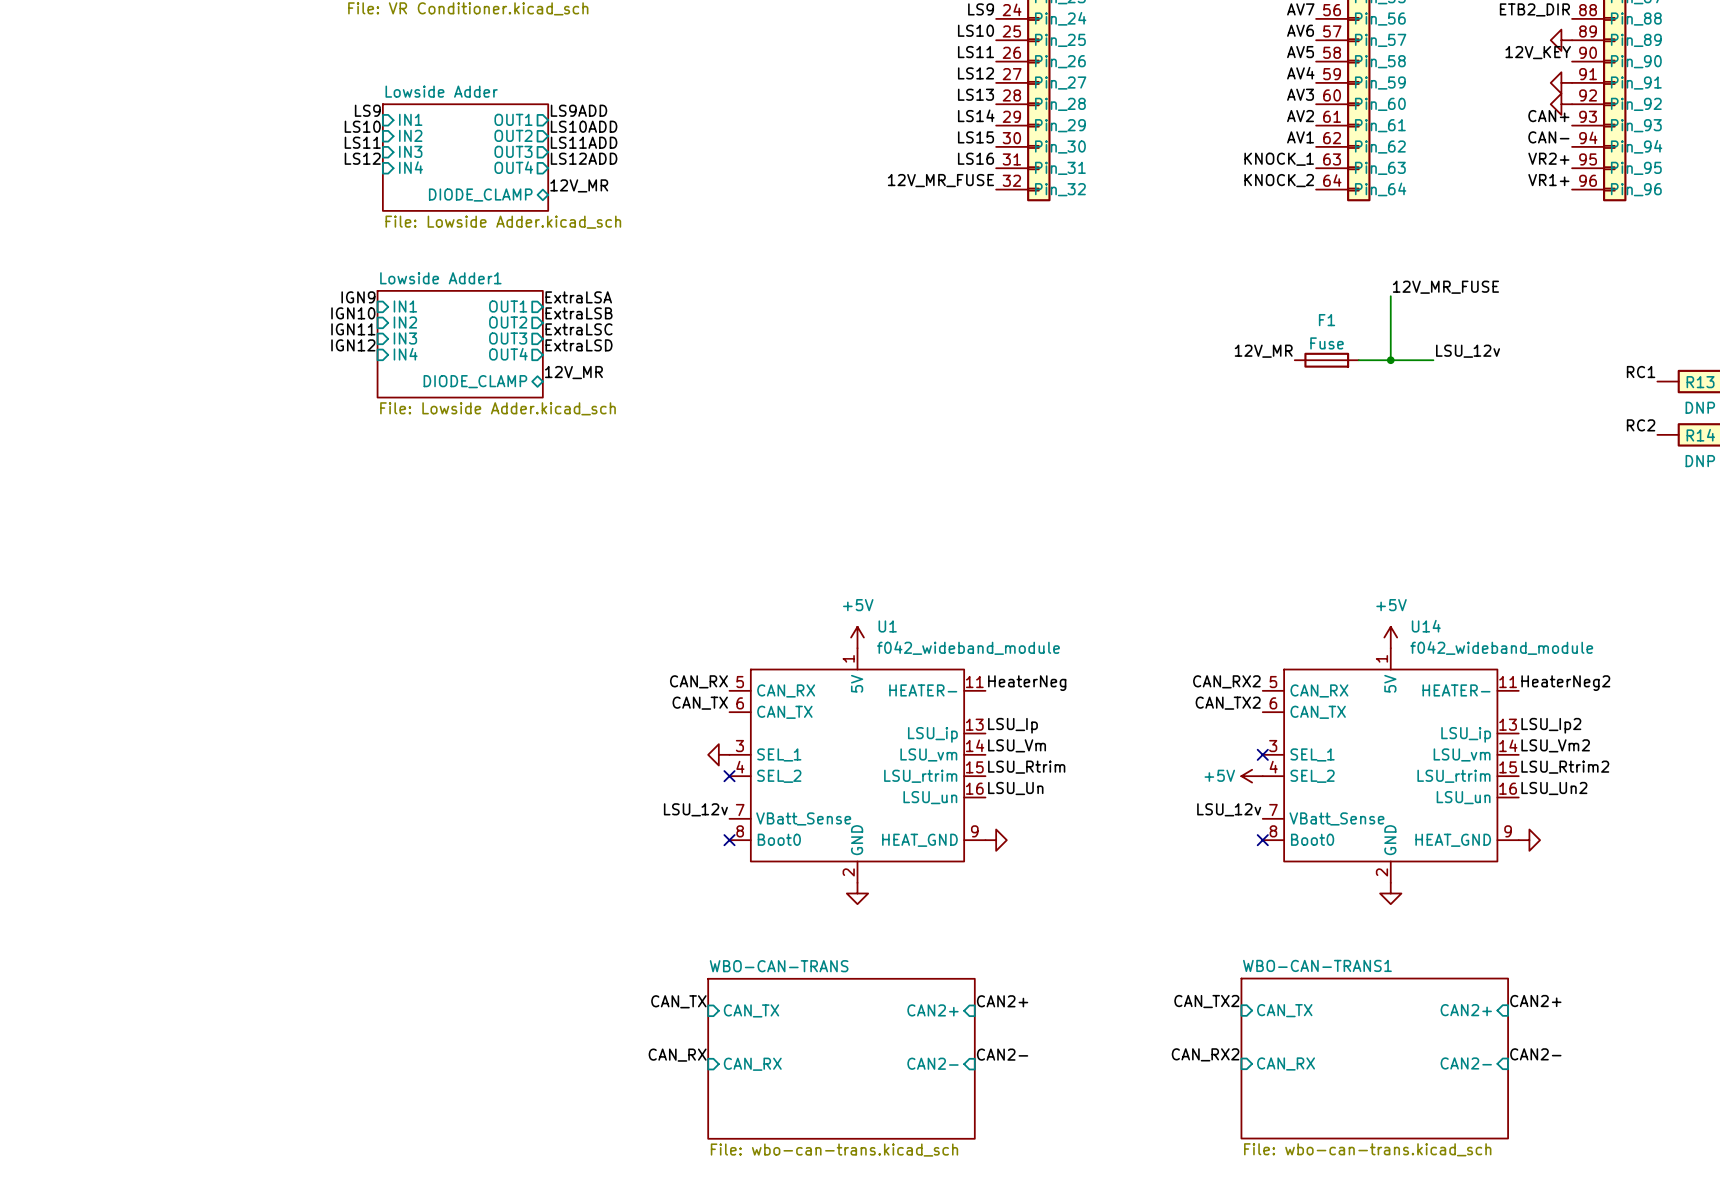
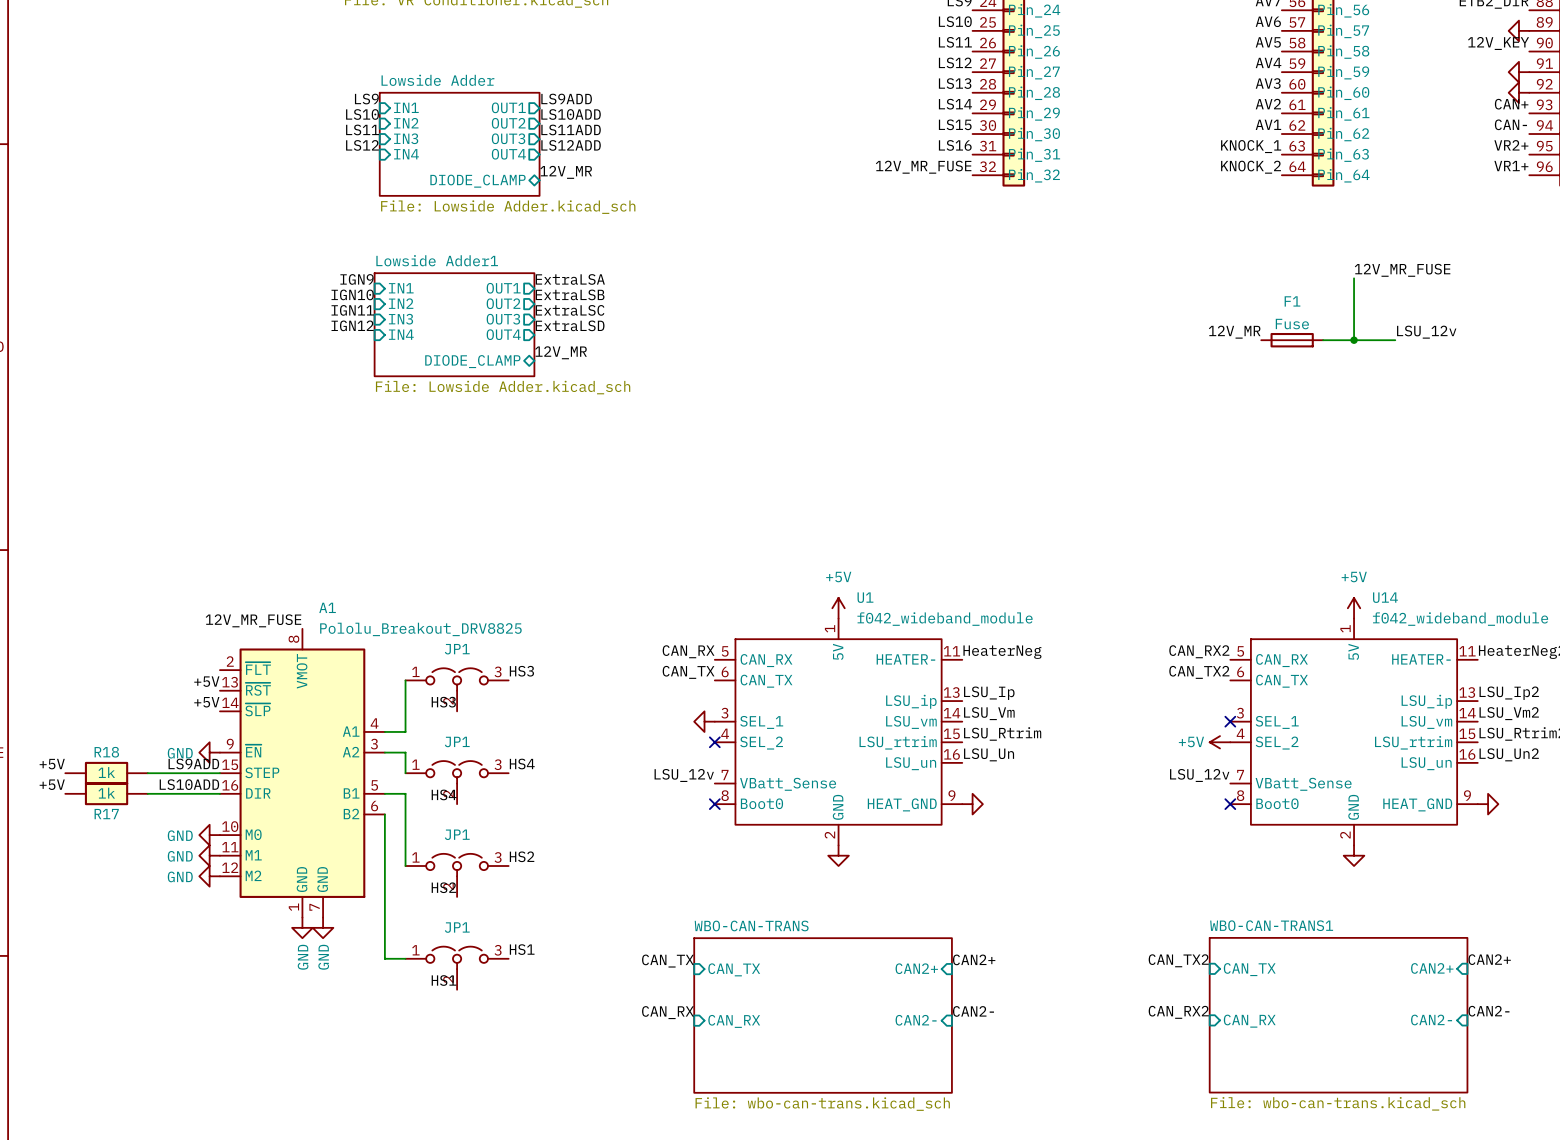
label: none -> 12V_MR_FUSE (253, 620)
label: none -> HS3 (521, 671)
wire: none -> (405, 680) (405, 731) (384, 731)
label: none -> +5V (206, 681)
JP1: none -> (457, 689)
label: none -> +5V (206, 702)
label: none -> HS3 (443, 702)
power symbol: none -> GND (209, 752)
wire: none -> (384, 752) (405, 752) (405, 773)
label: none -> +5V (52, 764)
label: none -> LS9ADD (193, 764)
label: none -> HS4 (522, 764)
R18: none -> 1k (106, 773)
wire: none -> (147, 773) (219, 773)
A1: none -> Pololu_Breakout_DRV8825 (302, 773)
JP1: none -> (457, 782)
label: none -> +5V (52, 784)
label: none -> LS10ADD (189, 784)
R17: none -> 1k (106, 793)
wire: none -> (147, 793) (219, 793)
wire: none -> (384, 793) (405, 793) (405, 866)
label: none -> HS4 (444, 794)
wire: none -> (384, 814) (384, 958) (405, 958)
power symbol: none -> GND (209, 835)
power symbol: none -> GND (209, 855)
label: none -> HS2 (522, 856)
JP1: none -> (457, 875)
power symbol: none -> GND (209, 876)
label: none -> HS2 (443, 887)
power symbol: none -> GND (302, 927)
power symbol: none -> GND (323, 927)
label: none -> HS1 (522, 949)
JP1: none -> (457, 968)
label: none -> HS1 (444, 980)

